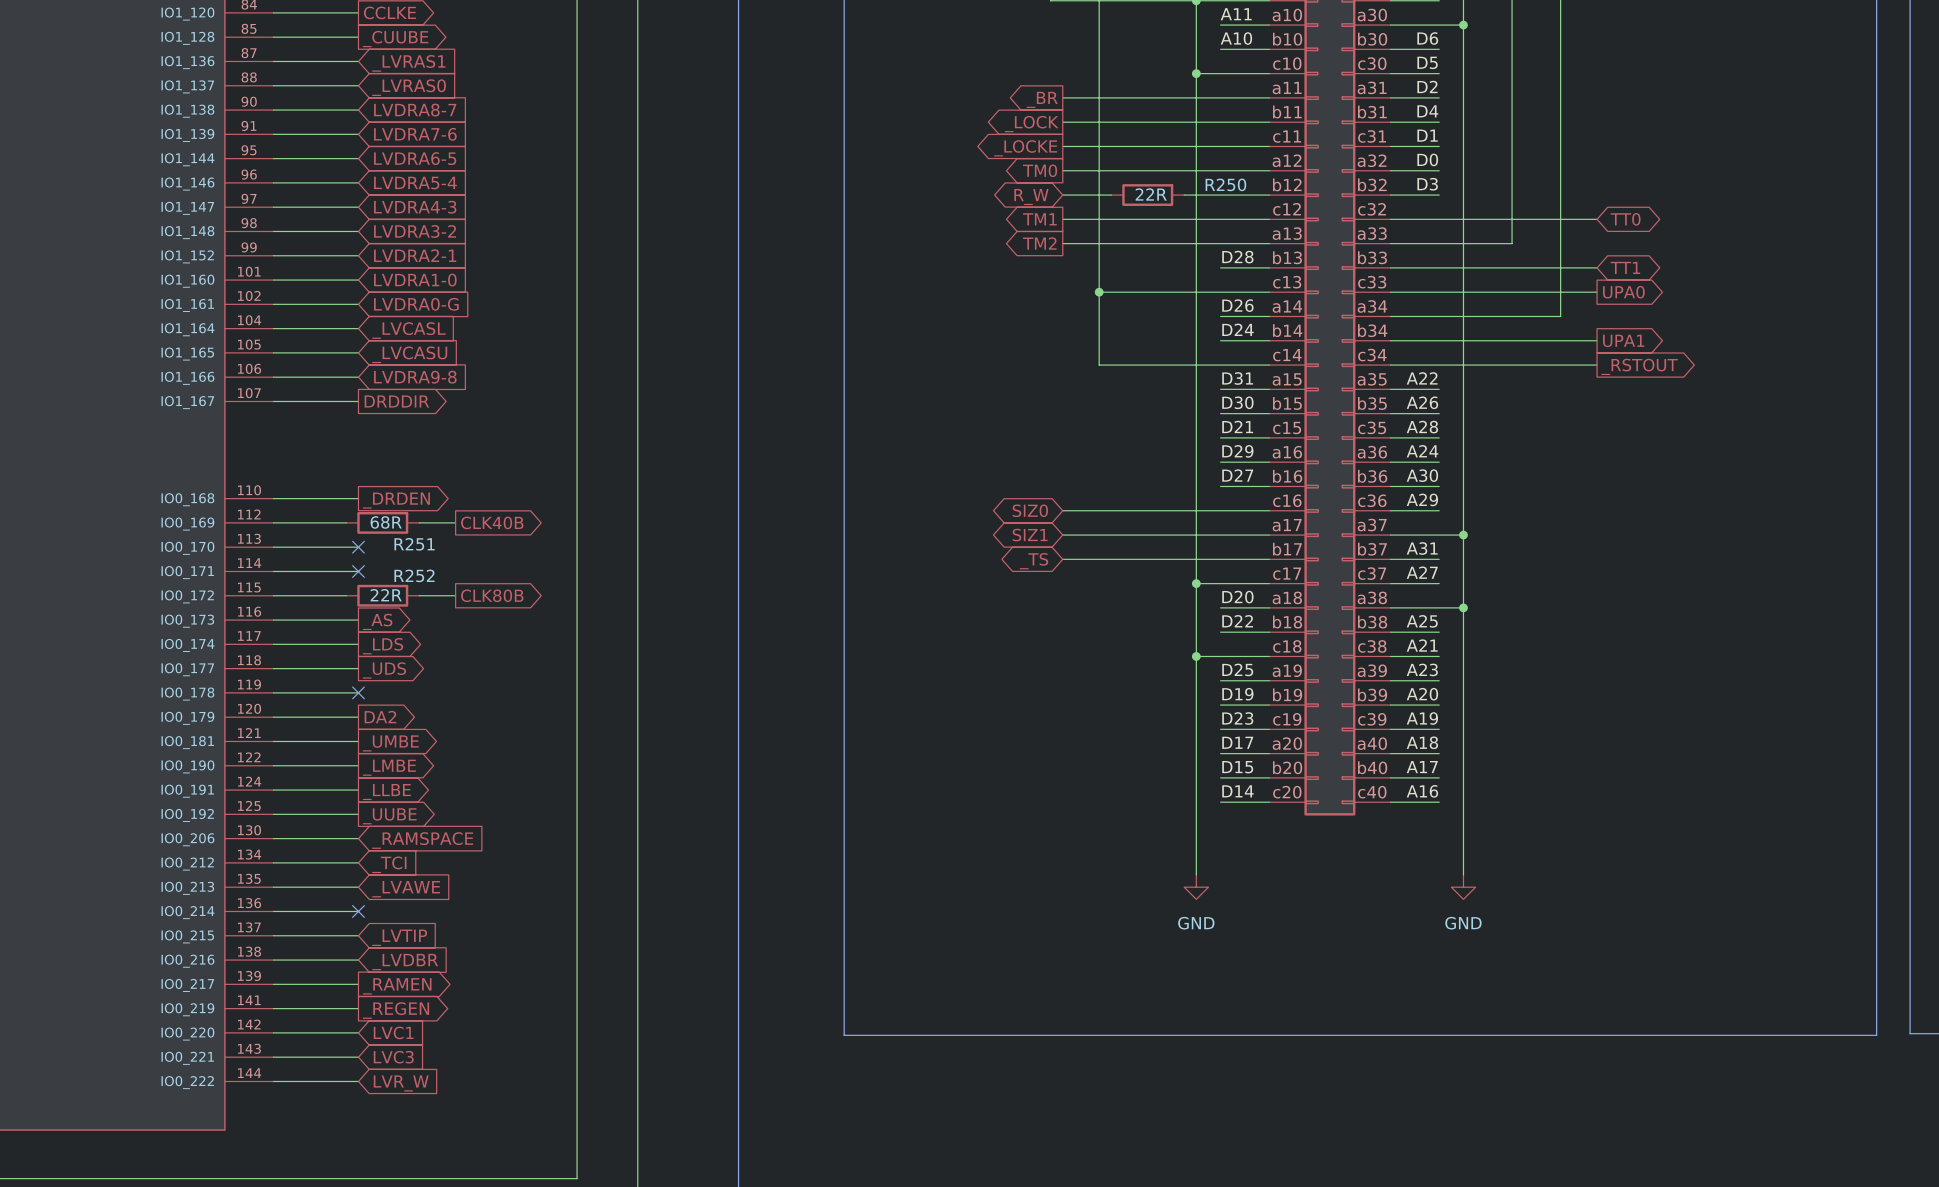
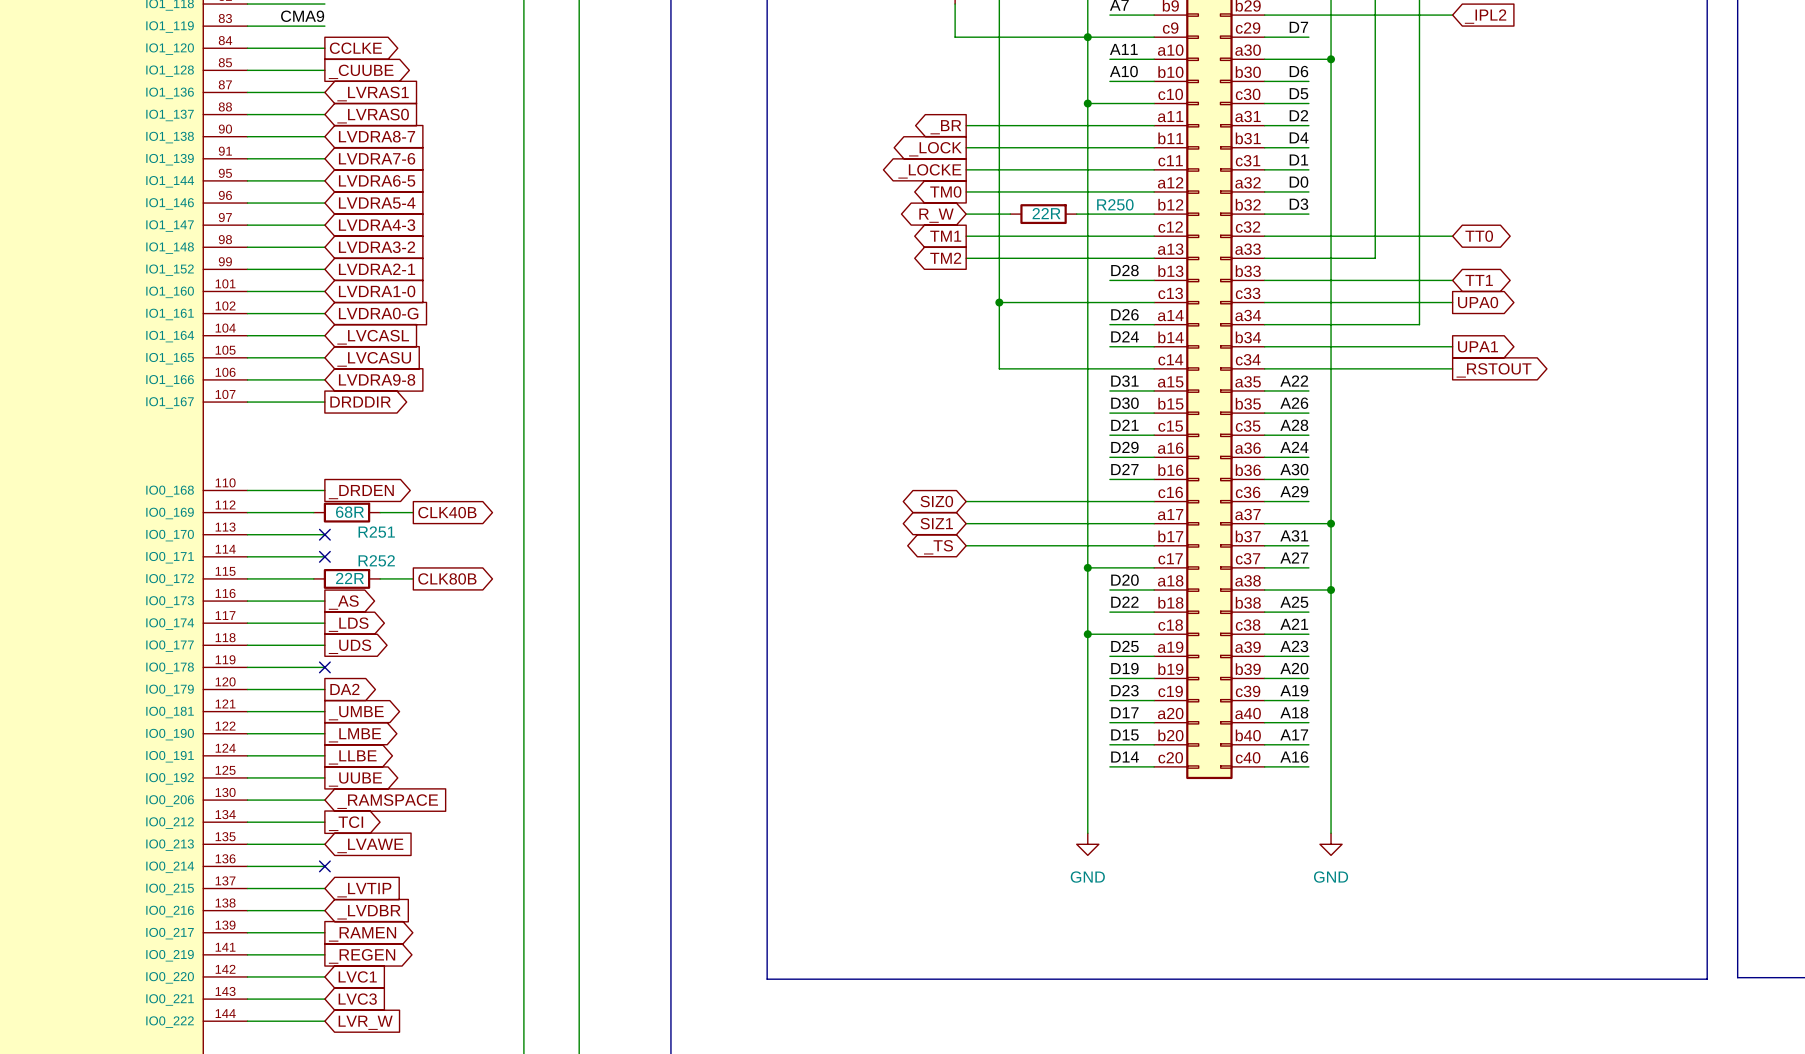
global label shape: input (389, 864) -> output (346, 823)

